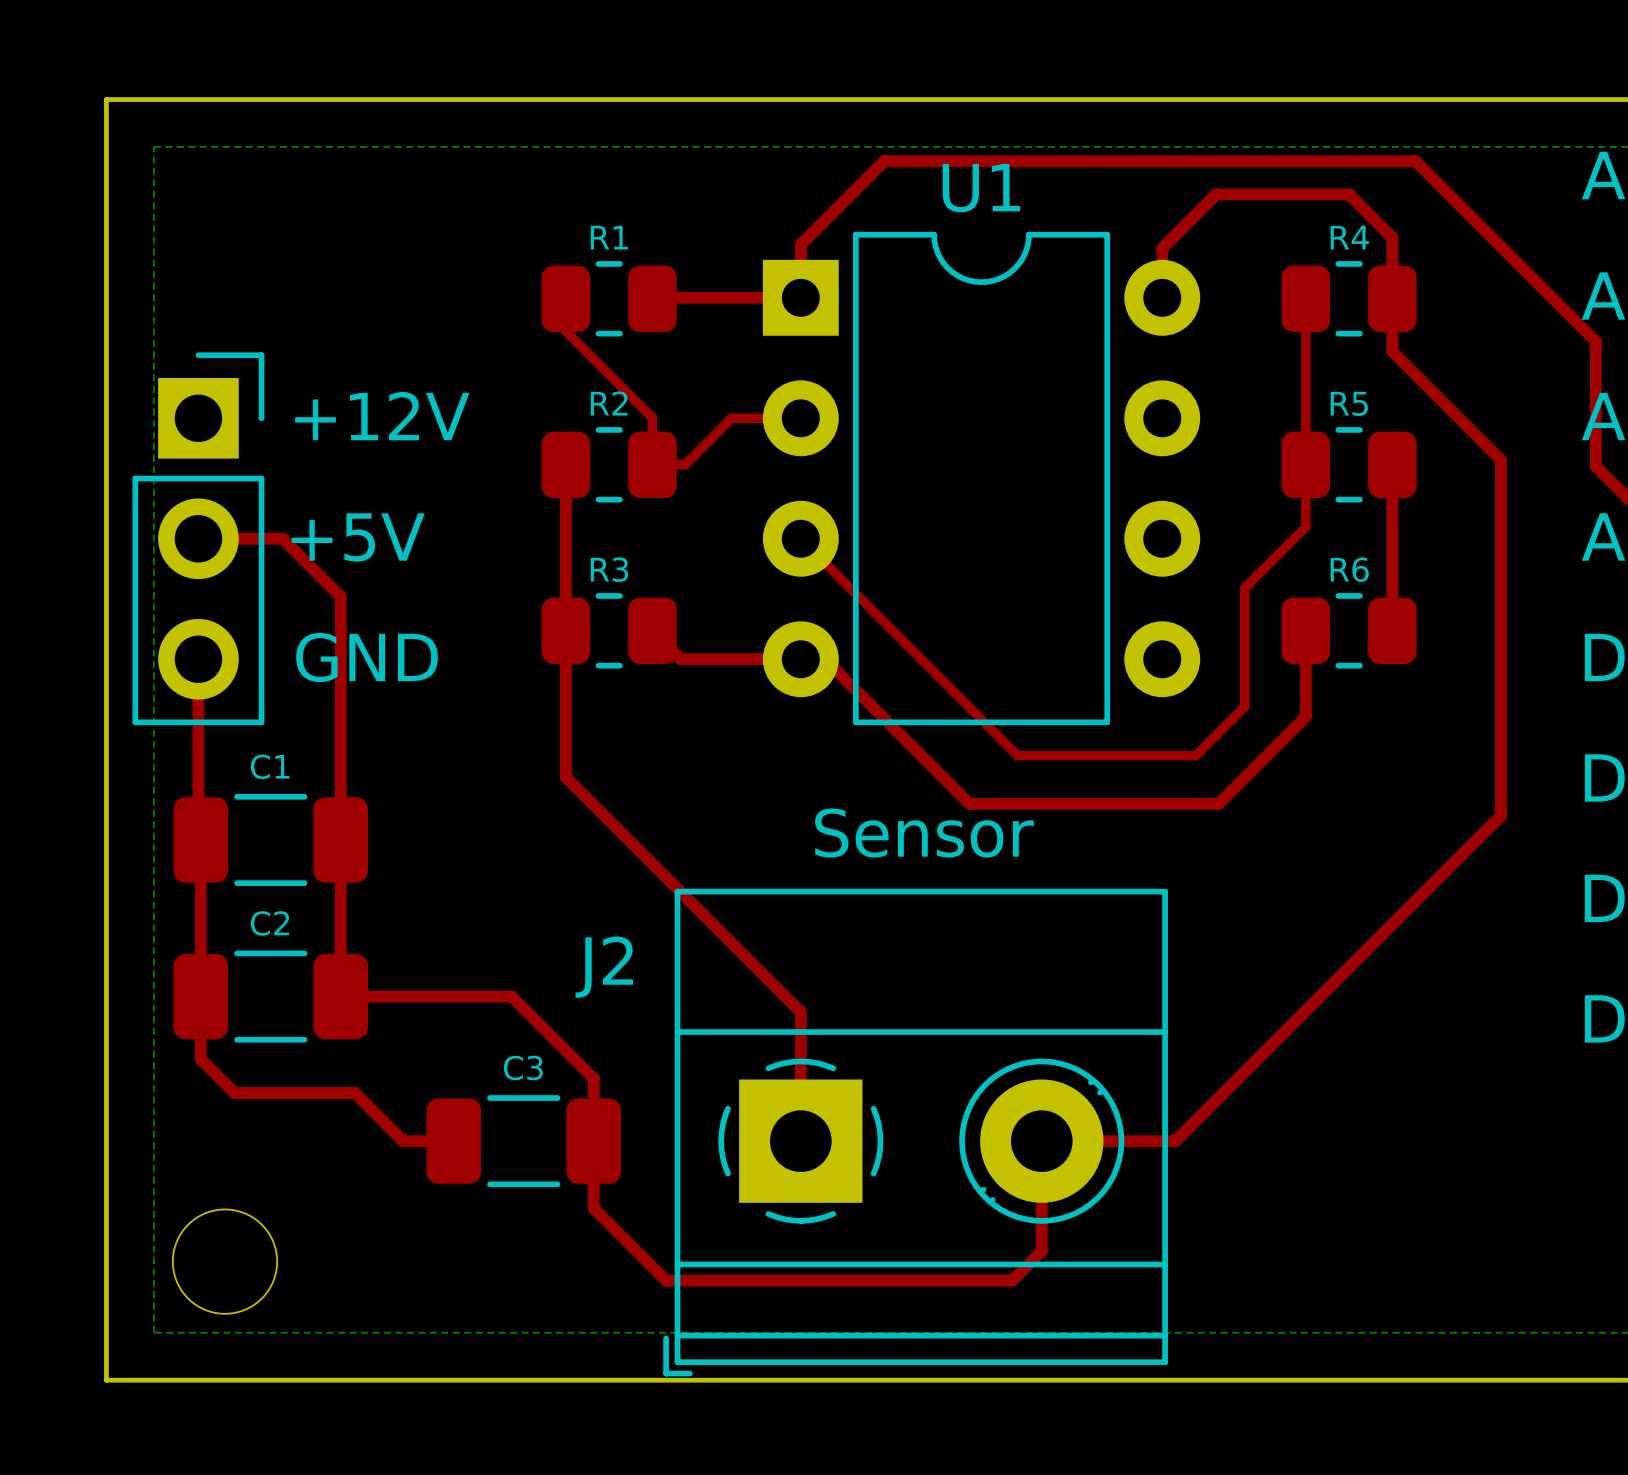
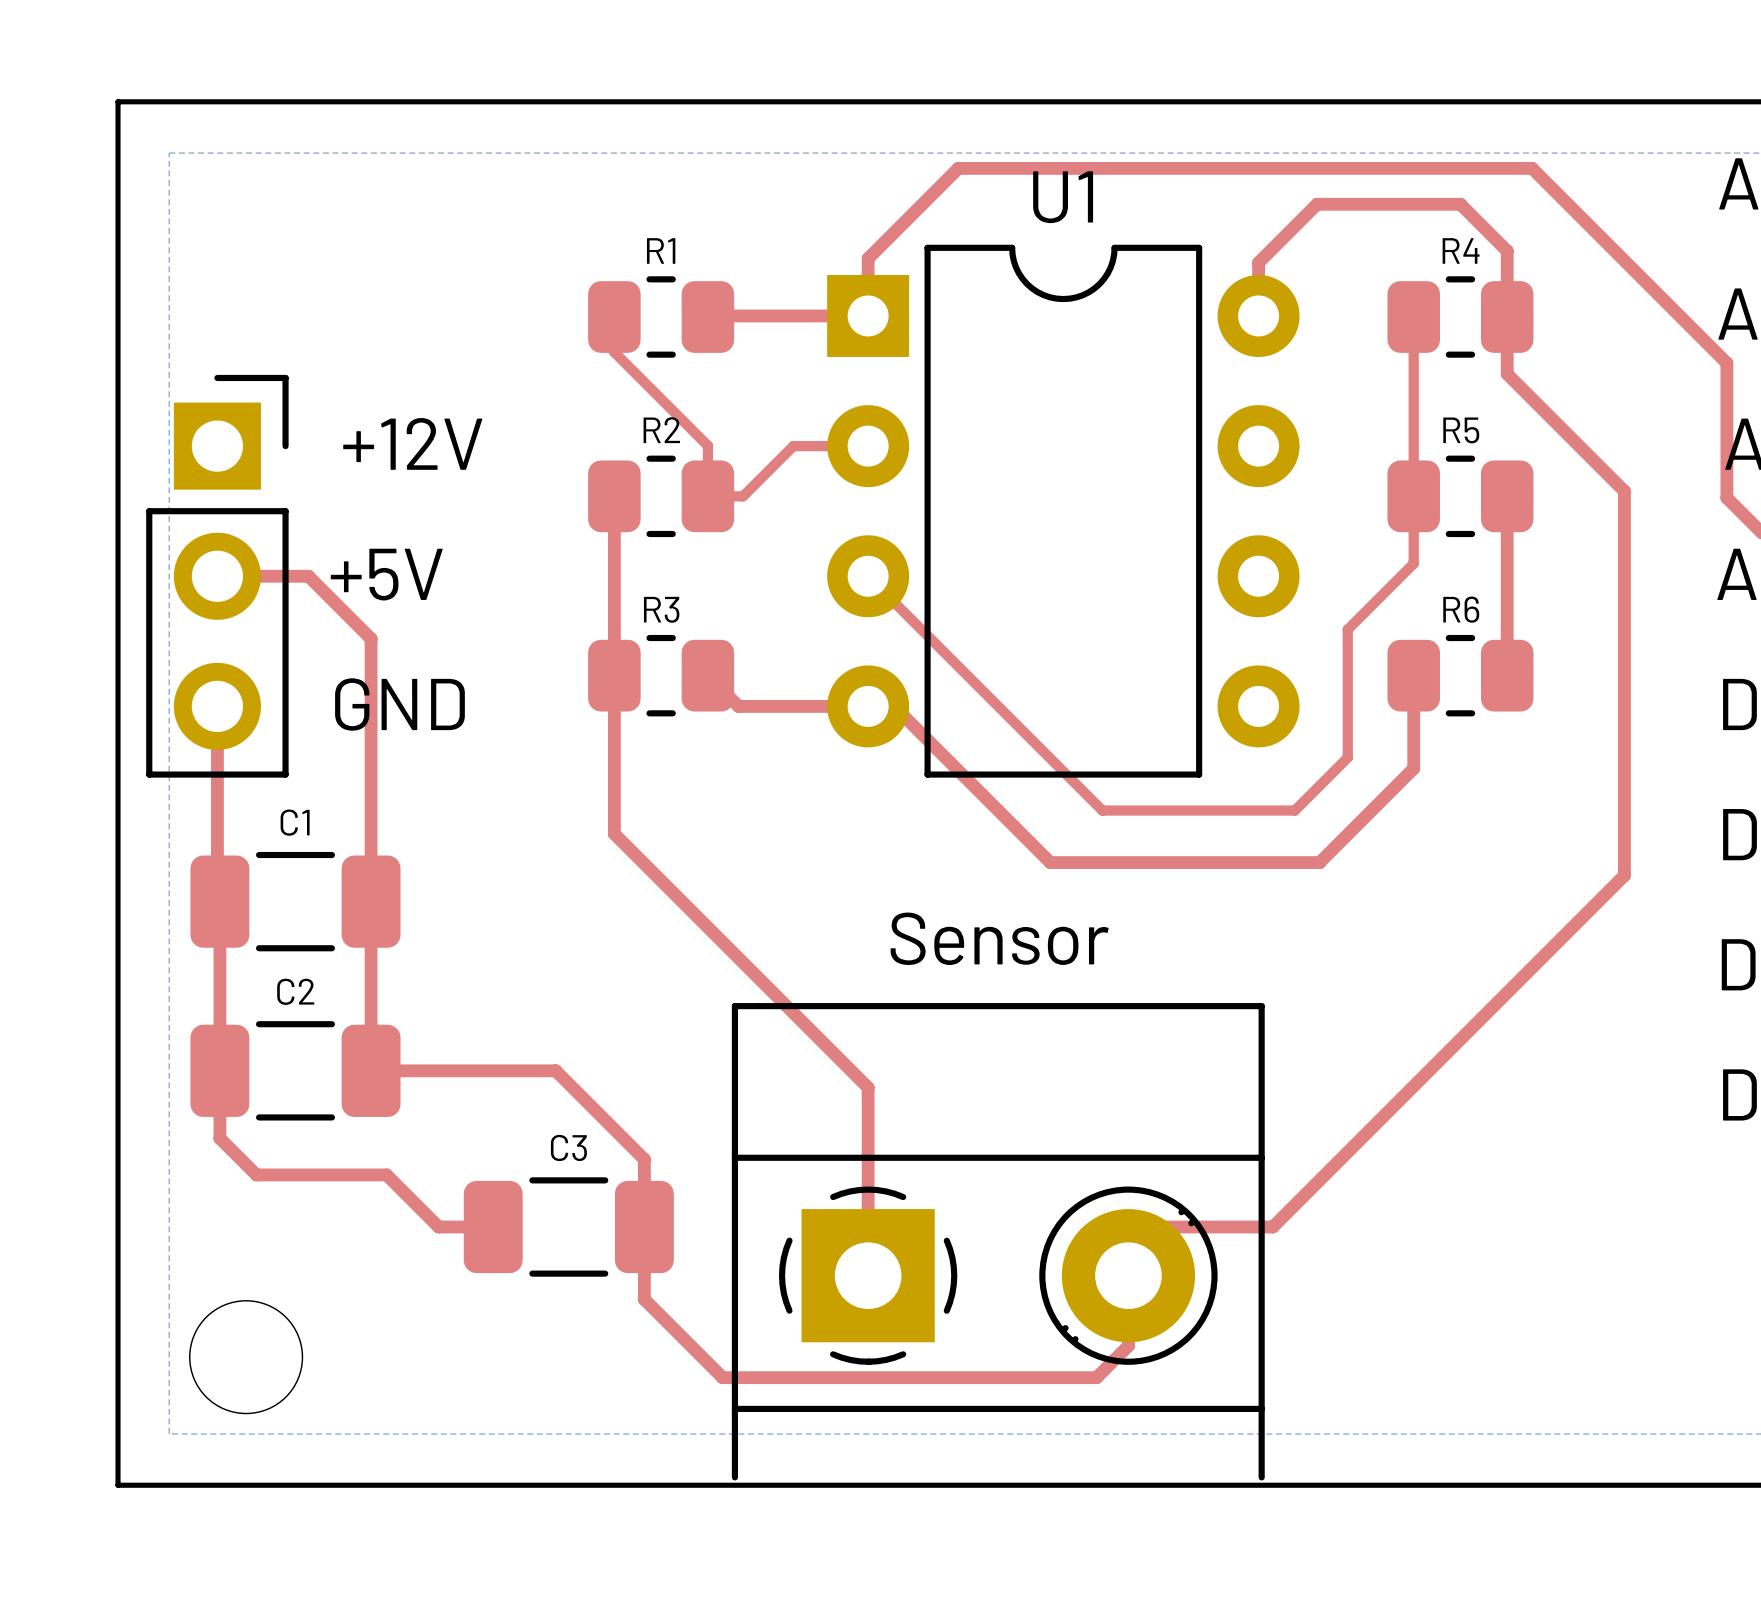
text position: Sensor (924, 833) -> Sensor (999, 938)
J2: (915, 1132) -> none
part: none -> (998, 1241)

